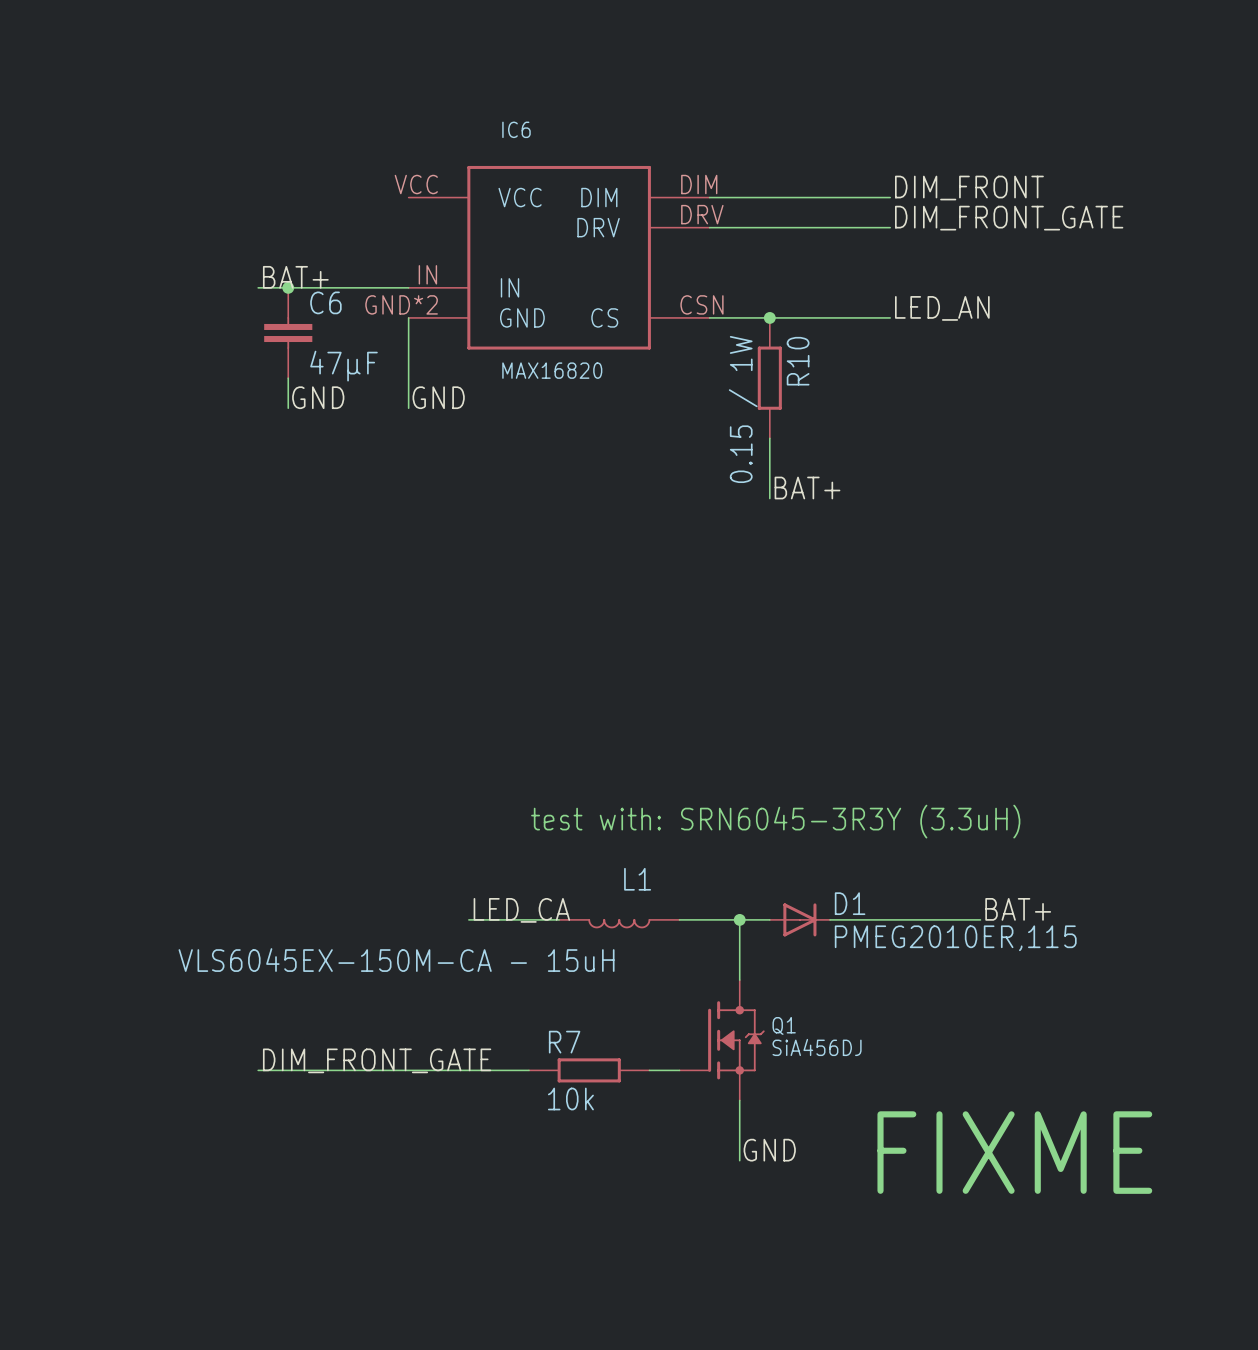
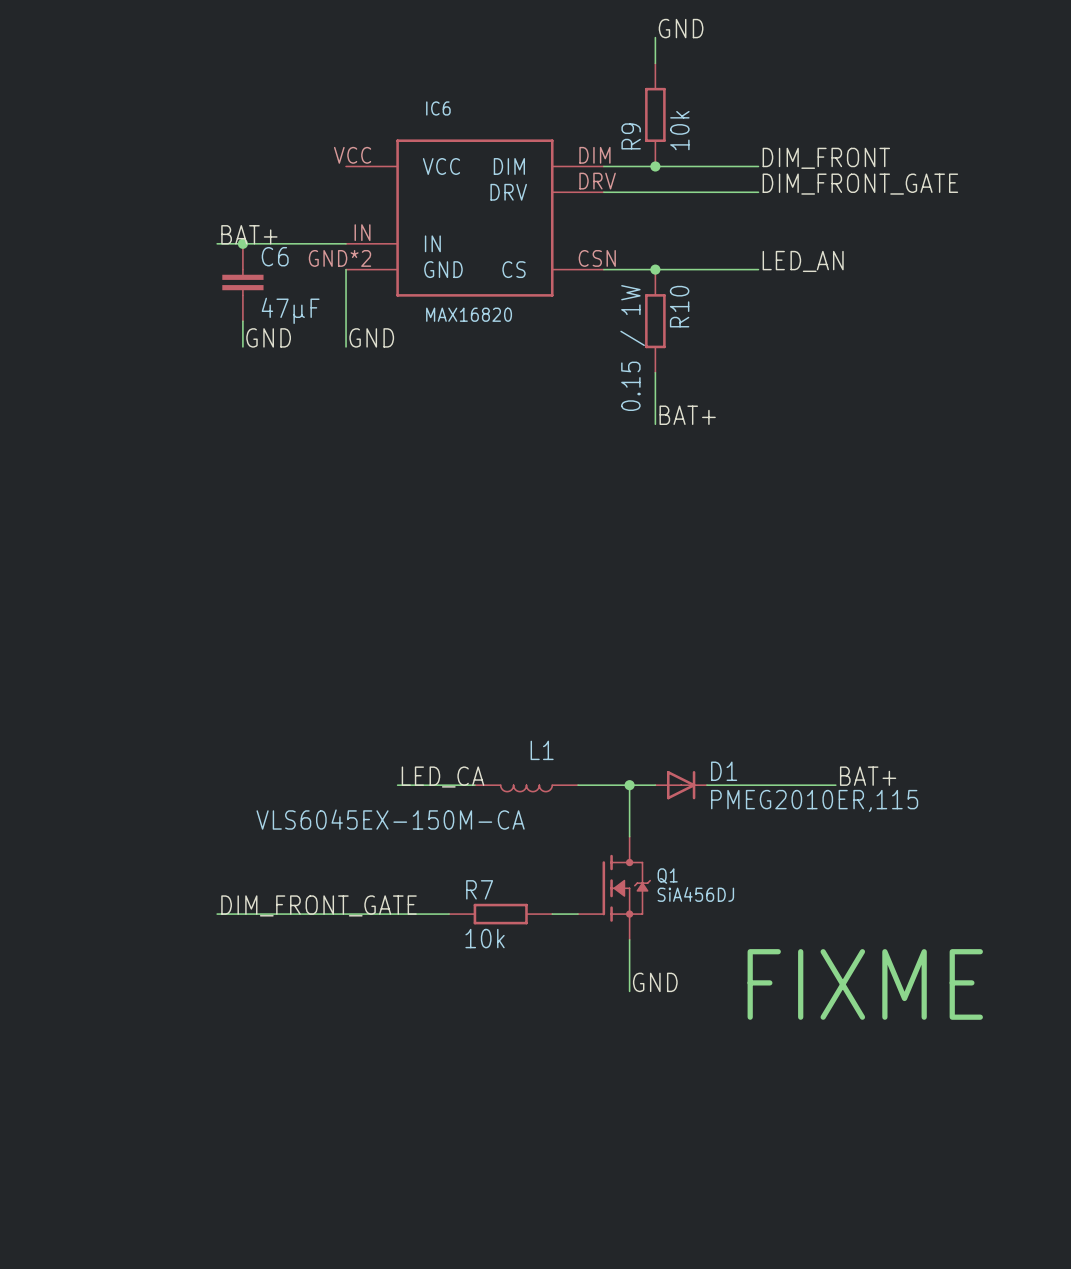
label: none -> GND (681, 28)
wire: none -> (655, 37) (655, 63)
R9: none -> 10k (655, 114)
junction: none -> (655, 166)
text: test with: SRN6045-3R3Y (3.3uH) (775, 821) -> none
L1 value: VLS6045EX-150M-CA - 15uH (396, 960) -> VLS6045EX-150M-CA (390, 819)

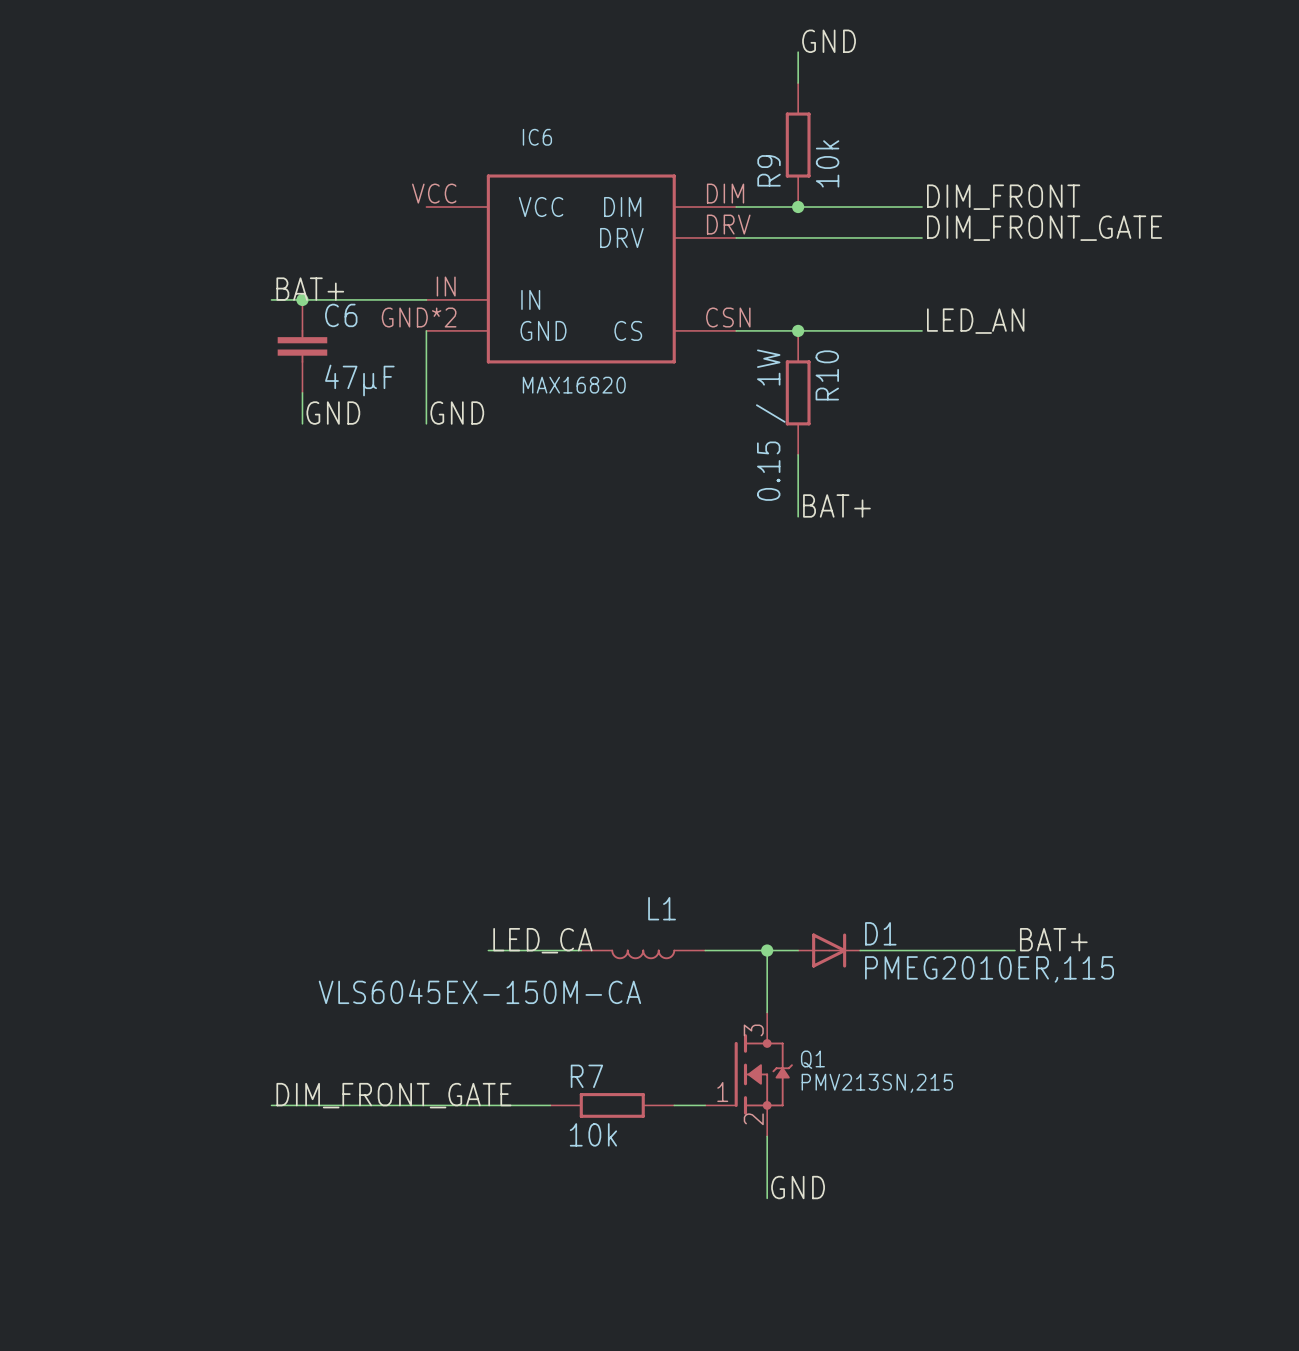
Q1 pin number: none -> 3 (753, 1030)
Q1 value: SiA456DJ (695, 894) -> PMV213SN,215 (877, 1083)
Q1 pin number: none -> 1 (722, 1092)
Q1 pin number: none -> 2 (753, 1119)
text: FIXME (865, 984) -> none

